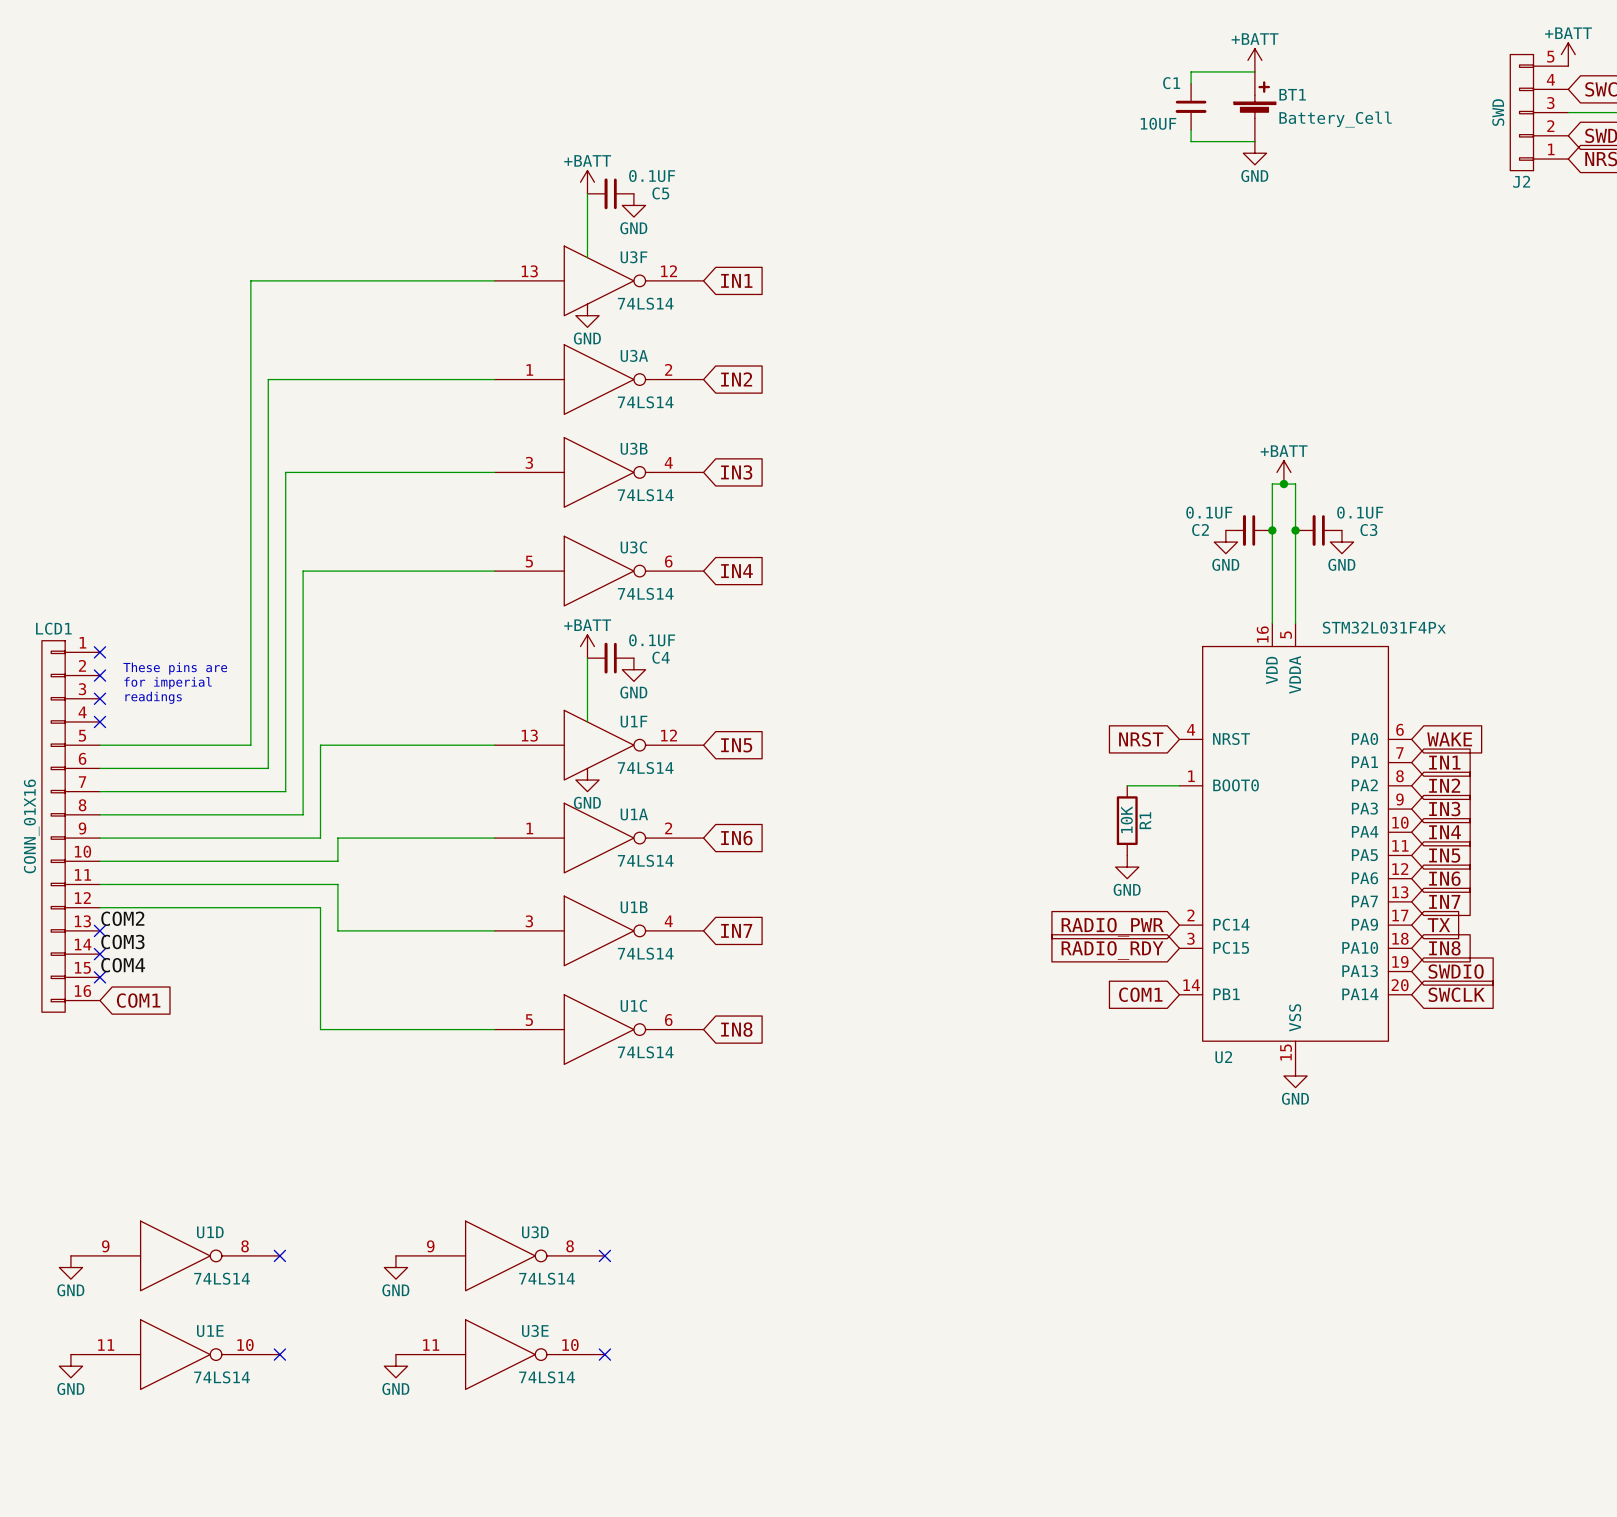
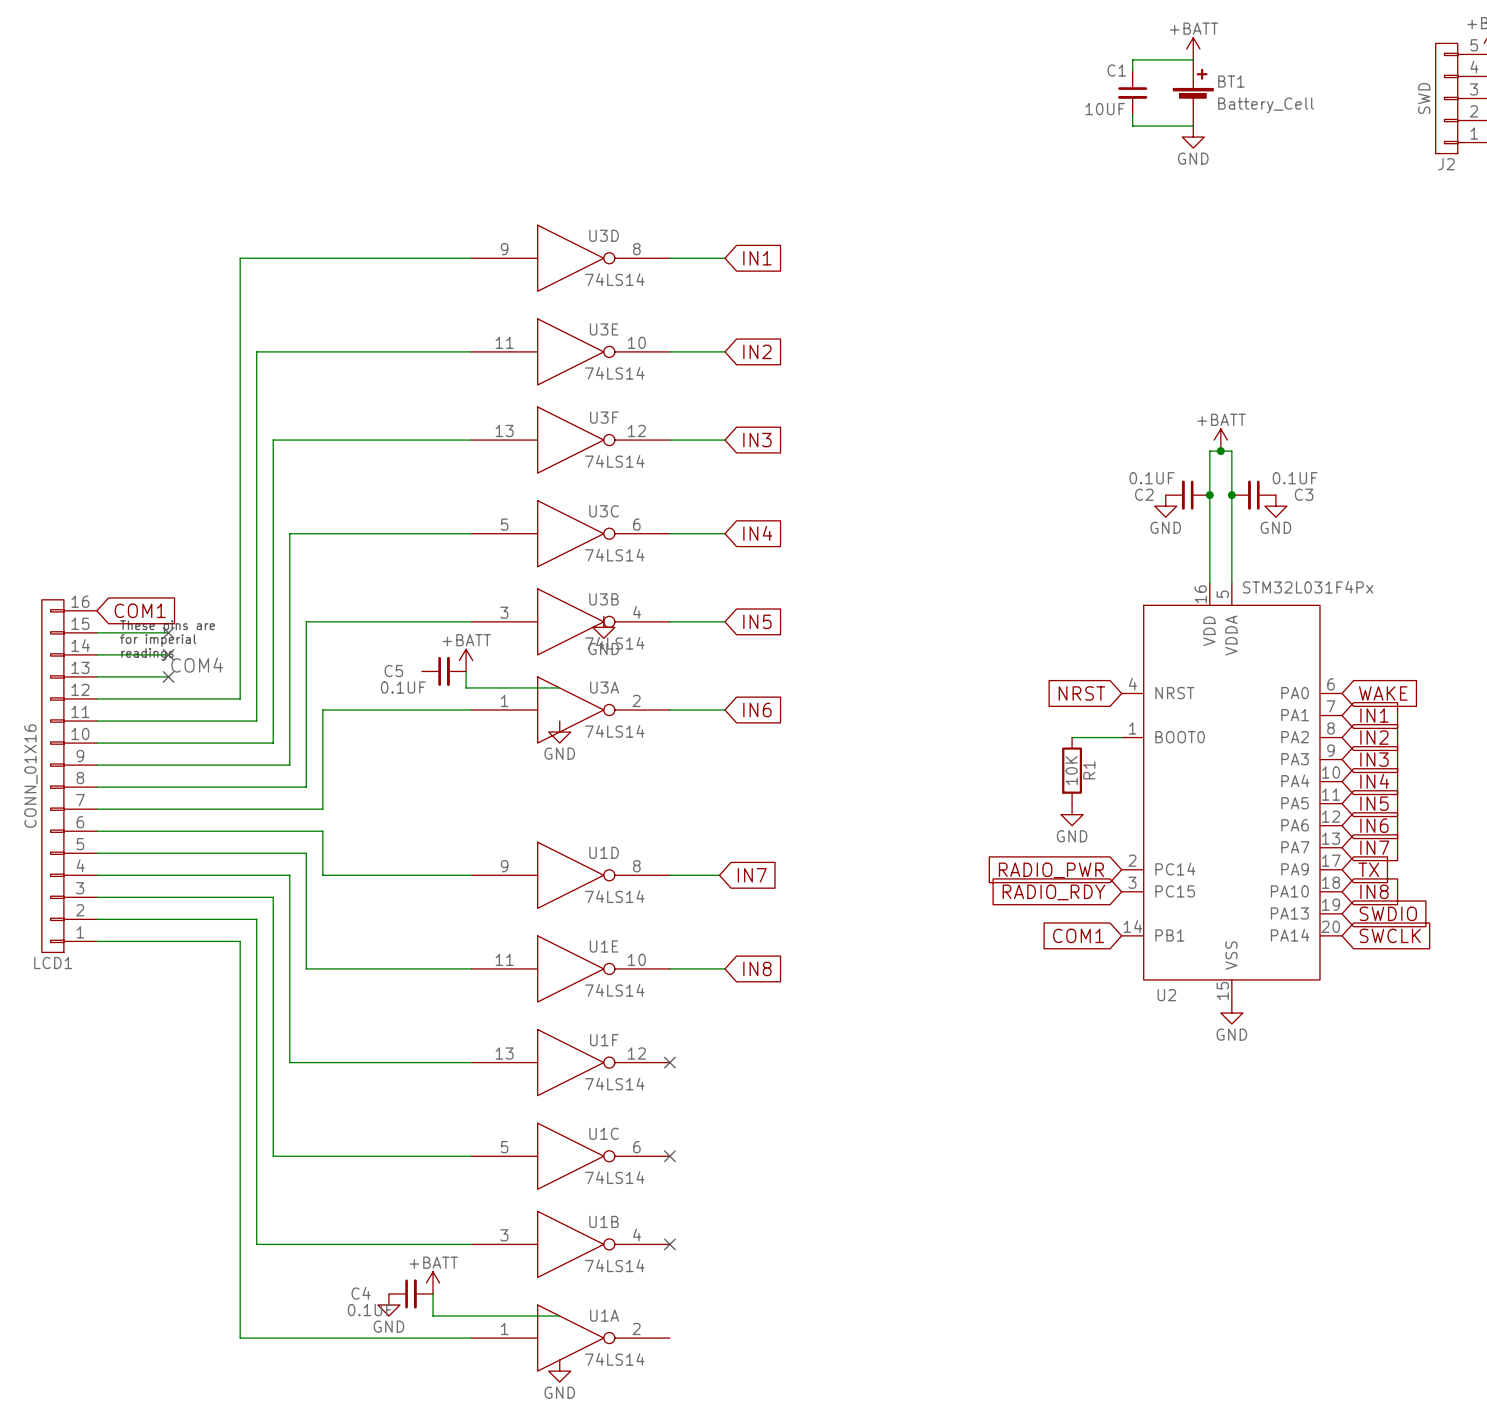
power symbol: +BATT (587, 182) -> none
wire: (587, 193) (587, 257) -> none
C5 rotation: 0° (610, 193) -> 180° (444, 671)
C5 position: (610, 193) -> (444, 671)
power symbol: GND (633, 205) -> none
U3F position: (599, 280) -> (570, 440)
wire: none -> (669, 258) (725, 258)
global label position: IN1 (736, 280) -> IN1 (757, 258)
power symbol: GND (587, 315) -> none
U3A position: (599, 379) -> (570, 710)
wire: none -> (669, 351) (725, 351)
global label position: IN2 (736, 379) -> IN2 (757, 351)
U3B position: (599, 472) -> (570, 621)
wire: none -> (669, 440) (725, 440)
global label position: IN3 (736, 472) -> IN3 (757, 440)
wire: none -> (669, 533) (725, 533)
global label position: IN4 (736, 571) -> IN4 (757, 533)
power symbol position: +BATT (587, 646) -> +BATT (466, 660)
no-connect mark: (99, 652) -> none
global label: none -> COM1 (140, 610)
wire: (587, 658) (587, 721) -> none
C4 rotation: 0° (610, 658) -> 180° (411, 1293)
C4 position: (610, 658) -> (410, 1293)
wire: none -> (669, 621) (725, 621)
wire: none -> (96, 632) (168, 632)
no-connect mark: (99, 675) -> none
no-connect mark: none -> (168, 632)
wire: none -> (96, 654) (168, 654)
no-connect mark: (99, 698) -> none
no-connect mark: none -> (168, 654)
label: none -> COM4 (197, 665)
wire: none -> (466, 671) (466, 687) (559, 687)
wire: none -> (96, 676) (168, 676)
no-connect mark: (99, 721) -> none
no-connect mark: none -> (168, 676)
wire: (320, 745) (494, 745) -> (306, 698) (306, 621) (471, 621)
U1F position: (599, 745) -> (570, 1062)
global label position: IN5 (736, 745) -> IN5 (757, 621)
wire: none -> (669, 710) (725, 710)
LCD1 flip: as is (53, 826) -> up-down (52, 776)
wire: (337, 838) (494, 838) -> (322, 787) (322, 710) (471, 710)
U1A position: (599, 838) -> (570, 1338)
global label position: IN6 (736, 838) -> IN6 (757, 710)
label: COM2 (122, 918) -> none
wire: none -> (96, 875) (289, 875) (289, 1062) (471, 1062)
no-connect mark: (99, 930) -> none
U1B position: (599, 930) -> (570, 1244)
wire: none -> (669, 875) (719, 875)
global label position: IN7 (736, 930) -> IN7 (752, 875)
label: COM3 (122, 941) -> none
wire: none -> (96, 897) (273, 897) (273, 1156) (471, 1156)
no-connect mark: (99, 954) -> none
label: COM4 (123, 965) -> none
wire: none -> (96, 919) (256, 919) (256, 1244) (471, 1244)
no-connect mark: (99, 977) -> none
wire: none -> (96, 941) (240, 941) (240, 1338) (471, 1338)
global label: COM1 (138, 1000) -> none
U1C position: (599, 1029) -> (570, 1156)
wire: none -> (669, 968) (725, 968)
global label position: IN8 (736, 1029) -> IN8 (757, 968)
no-connect mark: none -> (669, 1062)
no-connect mark: none -> (669, 1156)
U1D position: (175, 1255) -> (570, 875)
no-connect mark: (279, 1255) -> none
U3D position: (500, 1255) -> (570, 258)
no-connect mark: (604, 1255) -> none
power symbol: GND (70, 1267) -> none
power symbol: GND (395, 1267) -> none
no-connect mark: none -> (669, 1244)
U1E position: (175, 1354) -> (570, 968)
no-connect mark: (279, 1354) -> none
U3E position: (500, 1354) -> (570, 351)
no-connect mark: (604, 1354) -> none
power symbol: none -> +BATT (433, 1282)
power symbol: GND (70, 1366) -> none
power symbol position: GND (395, 1366) -> GND (388, 1305)
wire: none -> (433, 1293) (433, 1316) (559, 1316)
power symbol: none -> GND (559, 1371)

